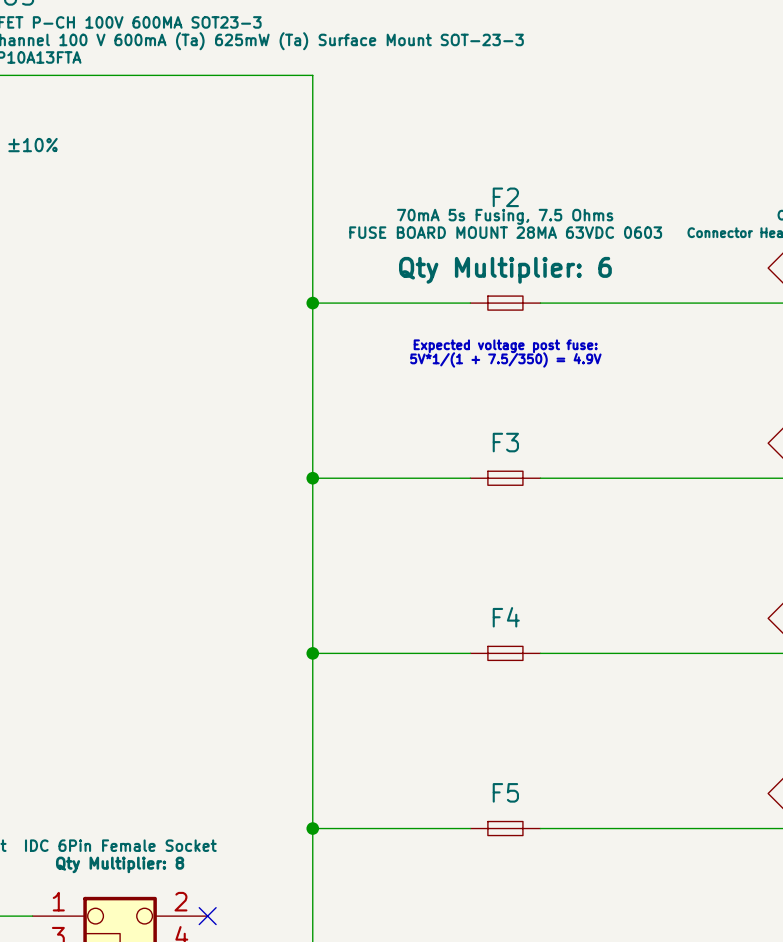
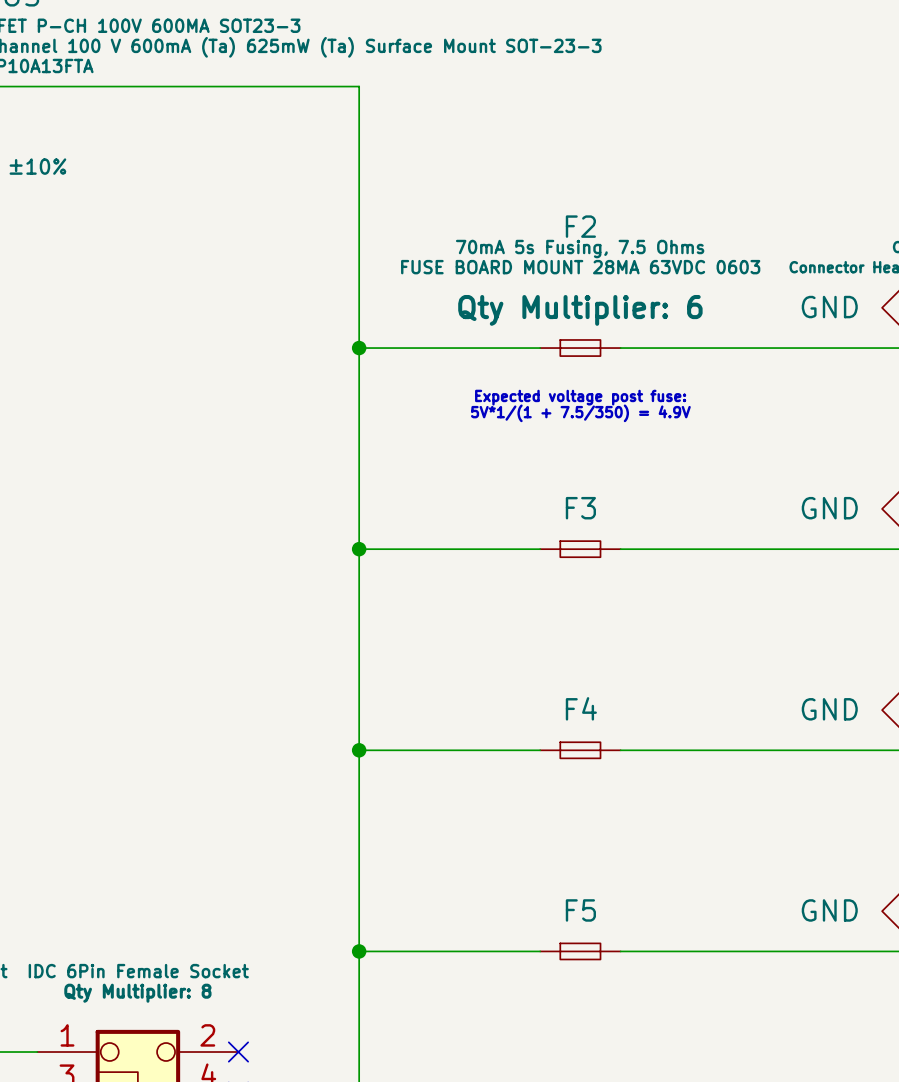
power symbol text: none -> GND (829, 307)
power symbol text: none -> GND (829, 508)
power symbol text: none -> GND (829, 709)
power symbol text: none -> GND (829, 910)

